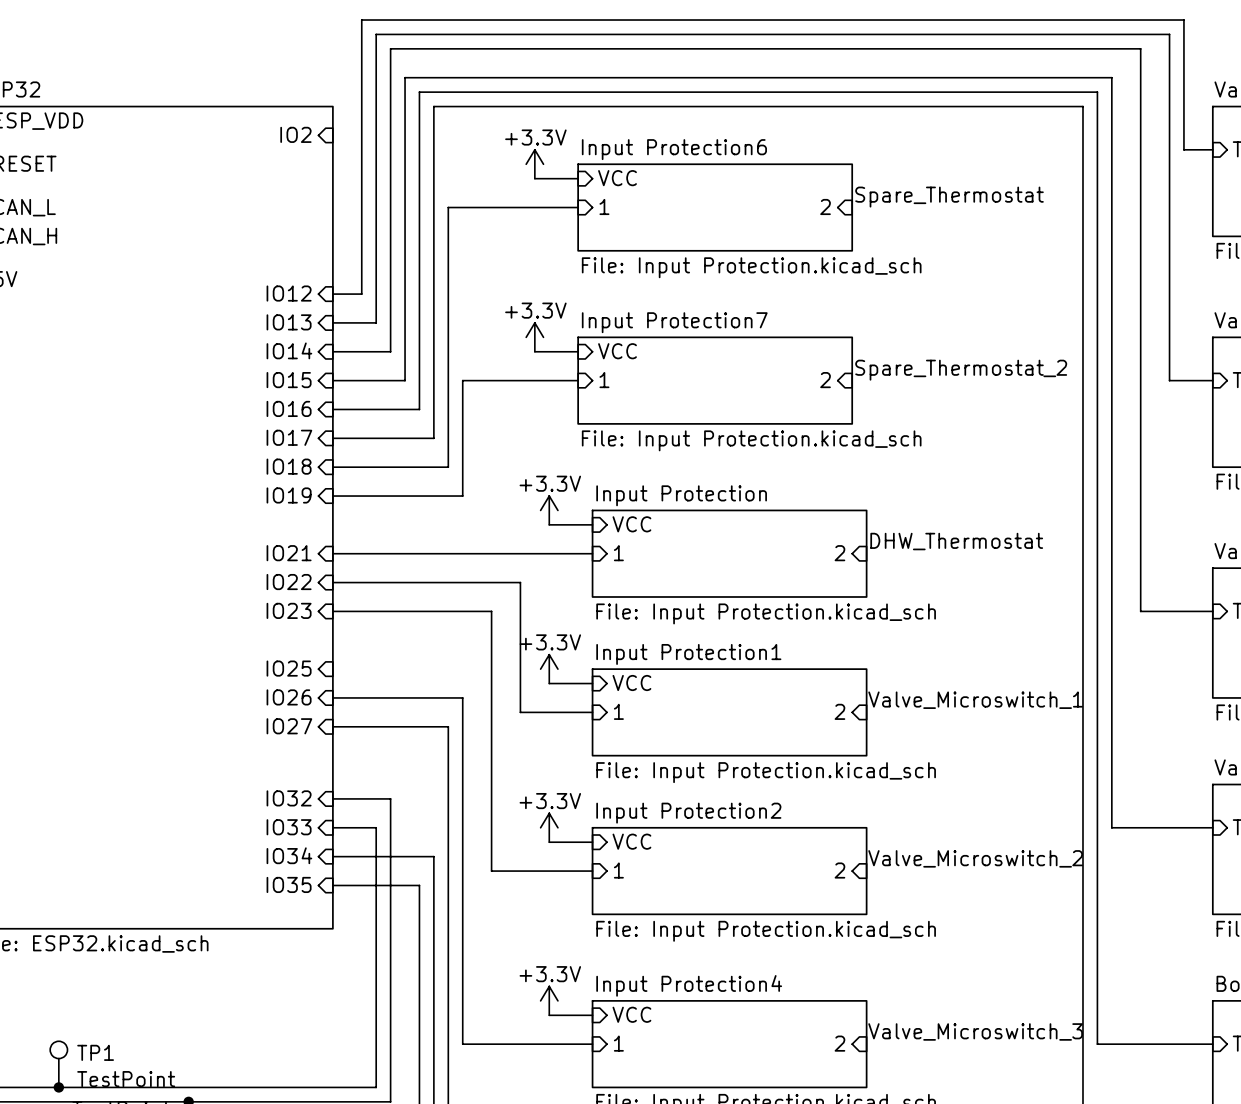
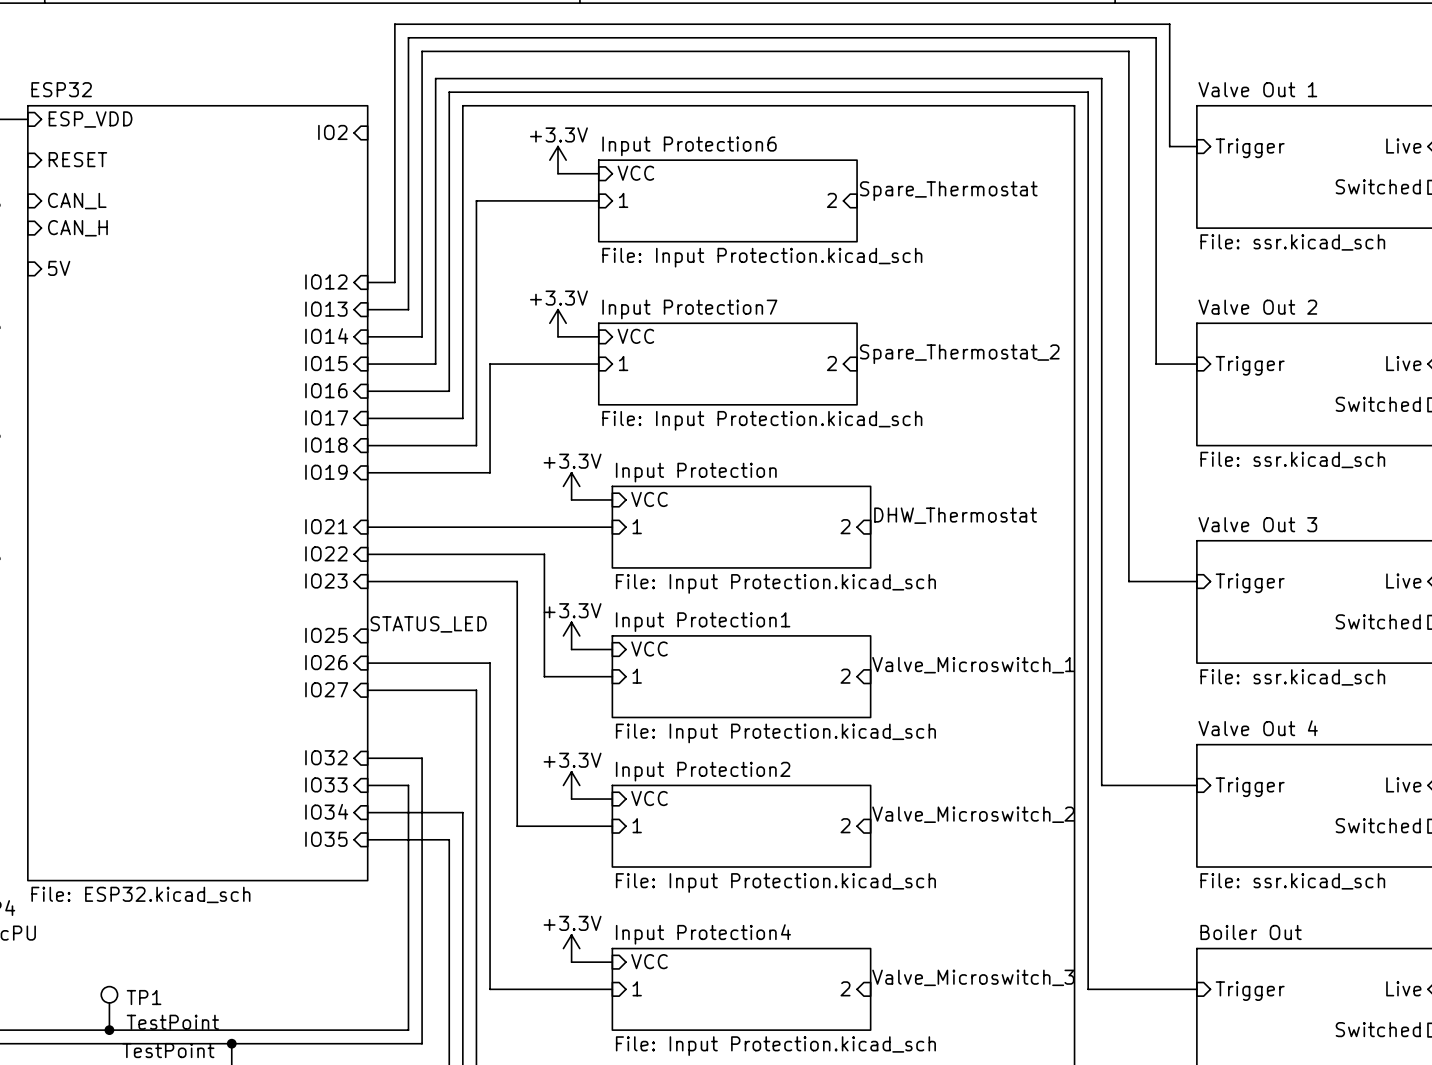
label: none -> STATUS_LED (428, 624)

